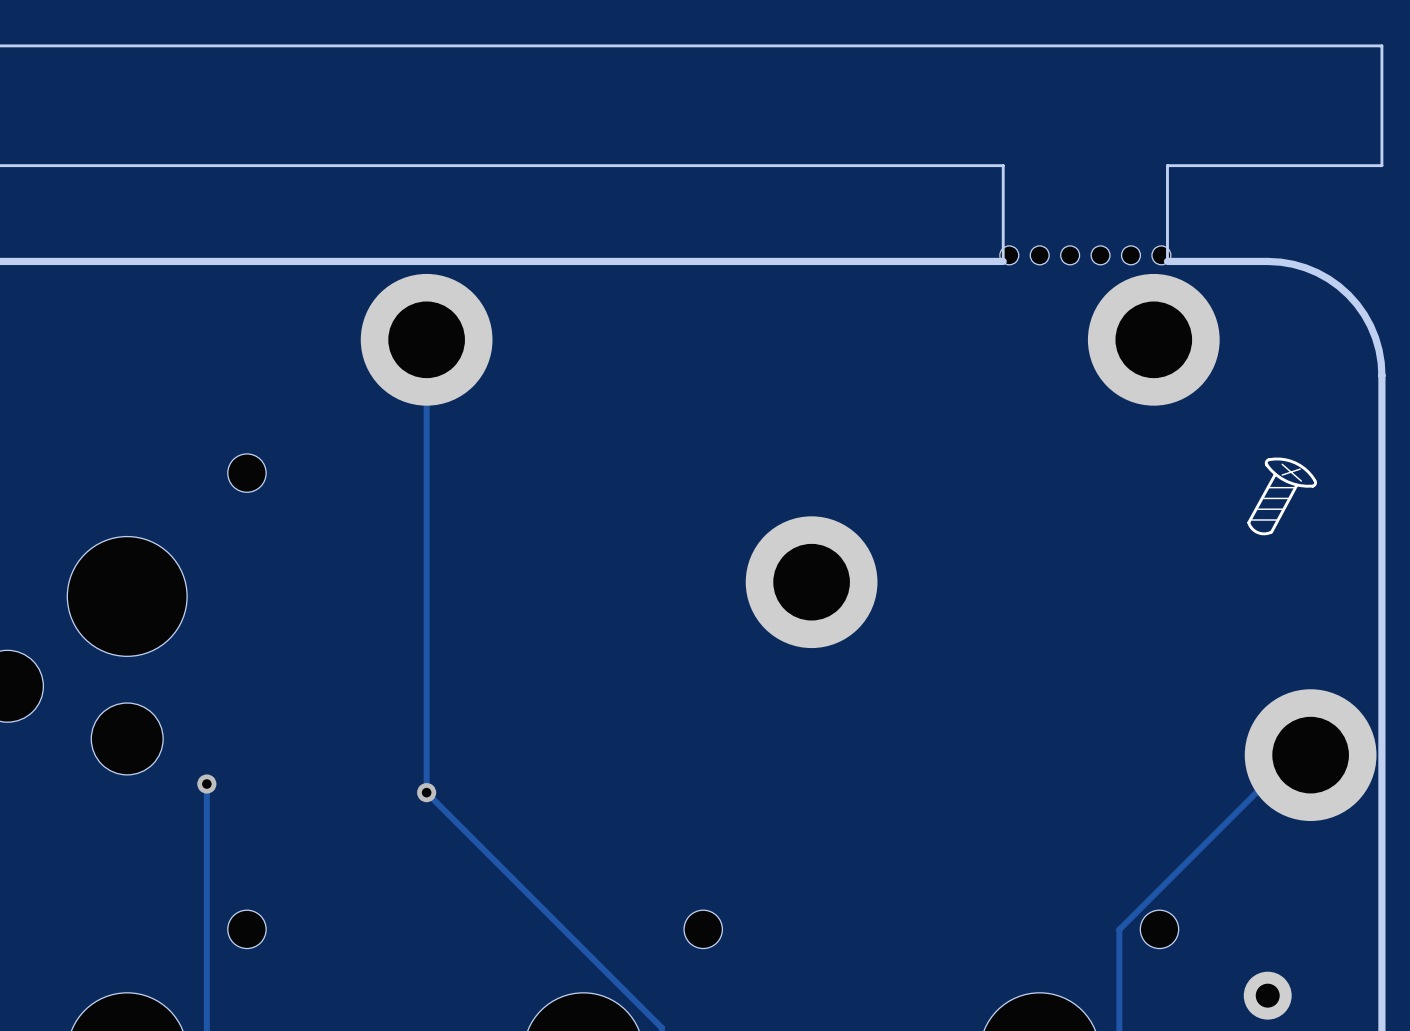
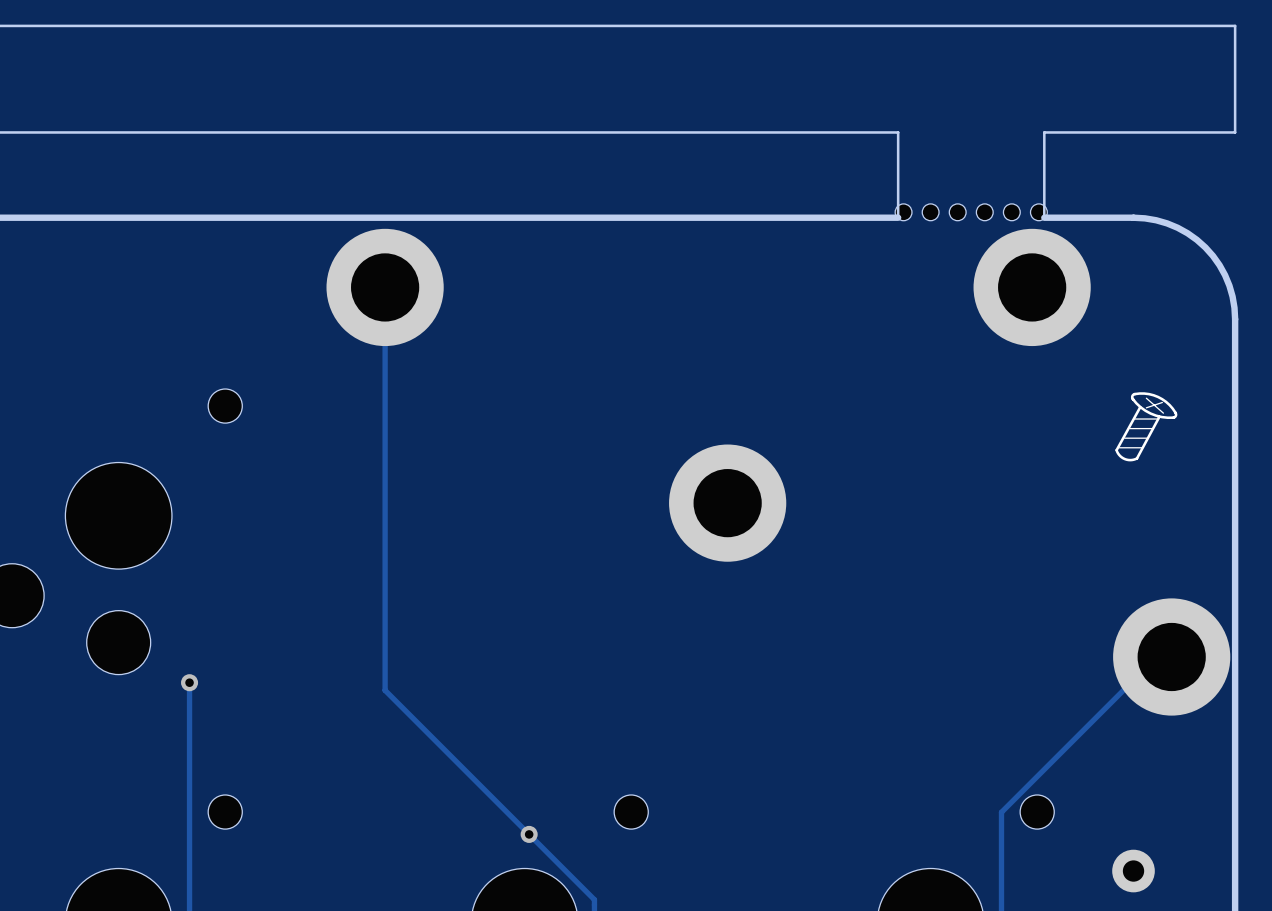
via: (426, 792) -> none
via: none -> (529, 834)

